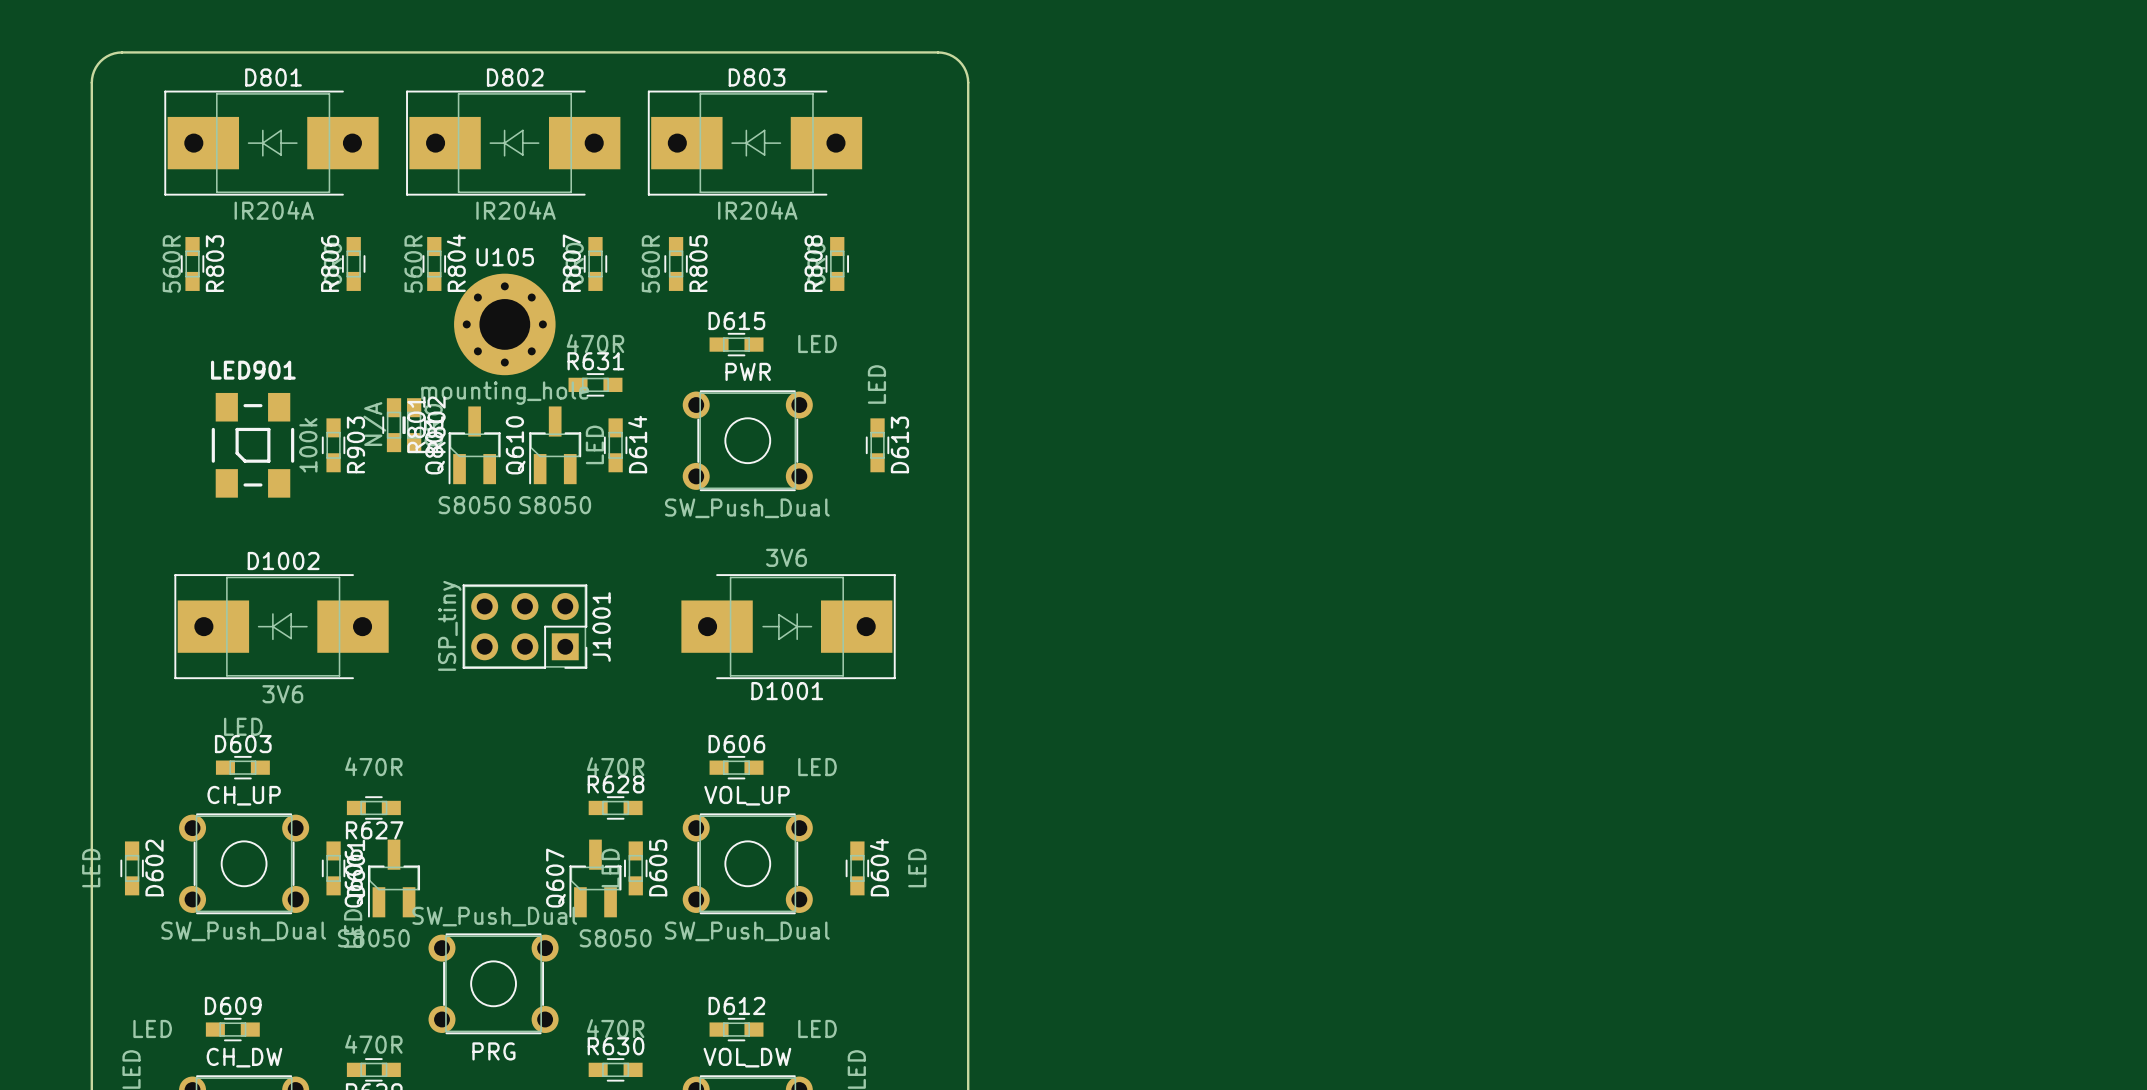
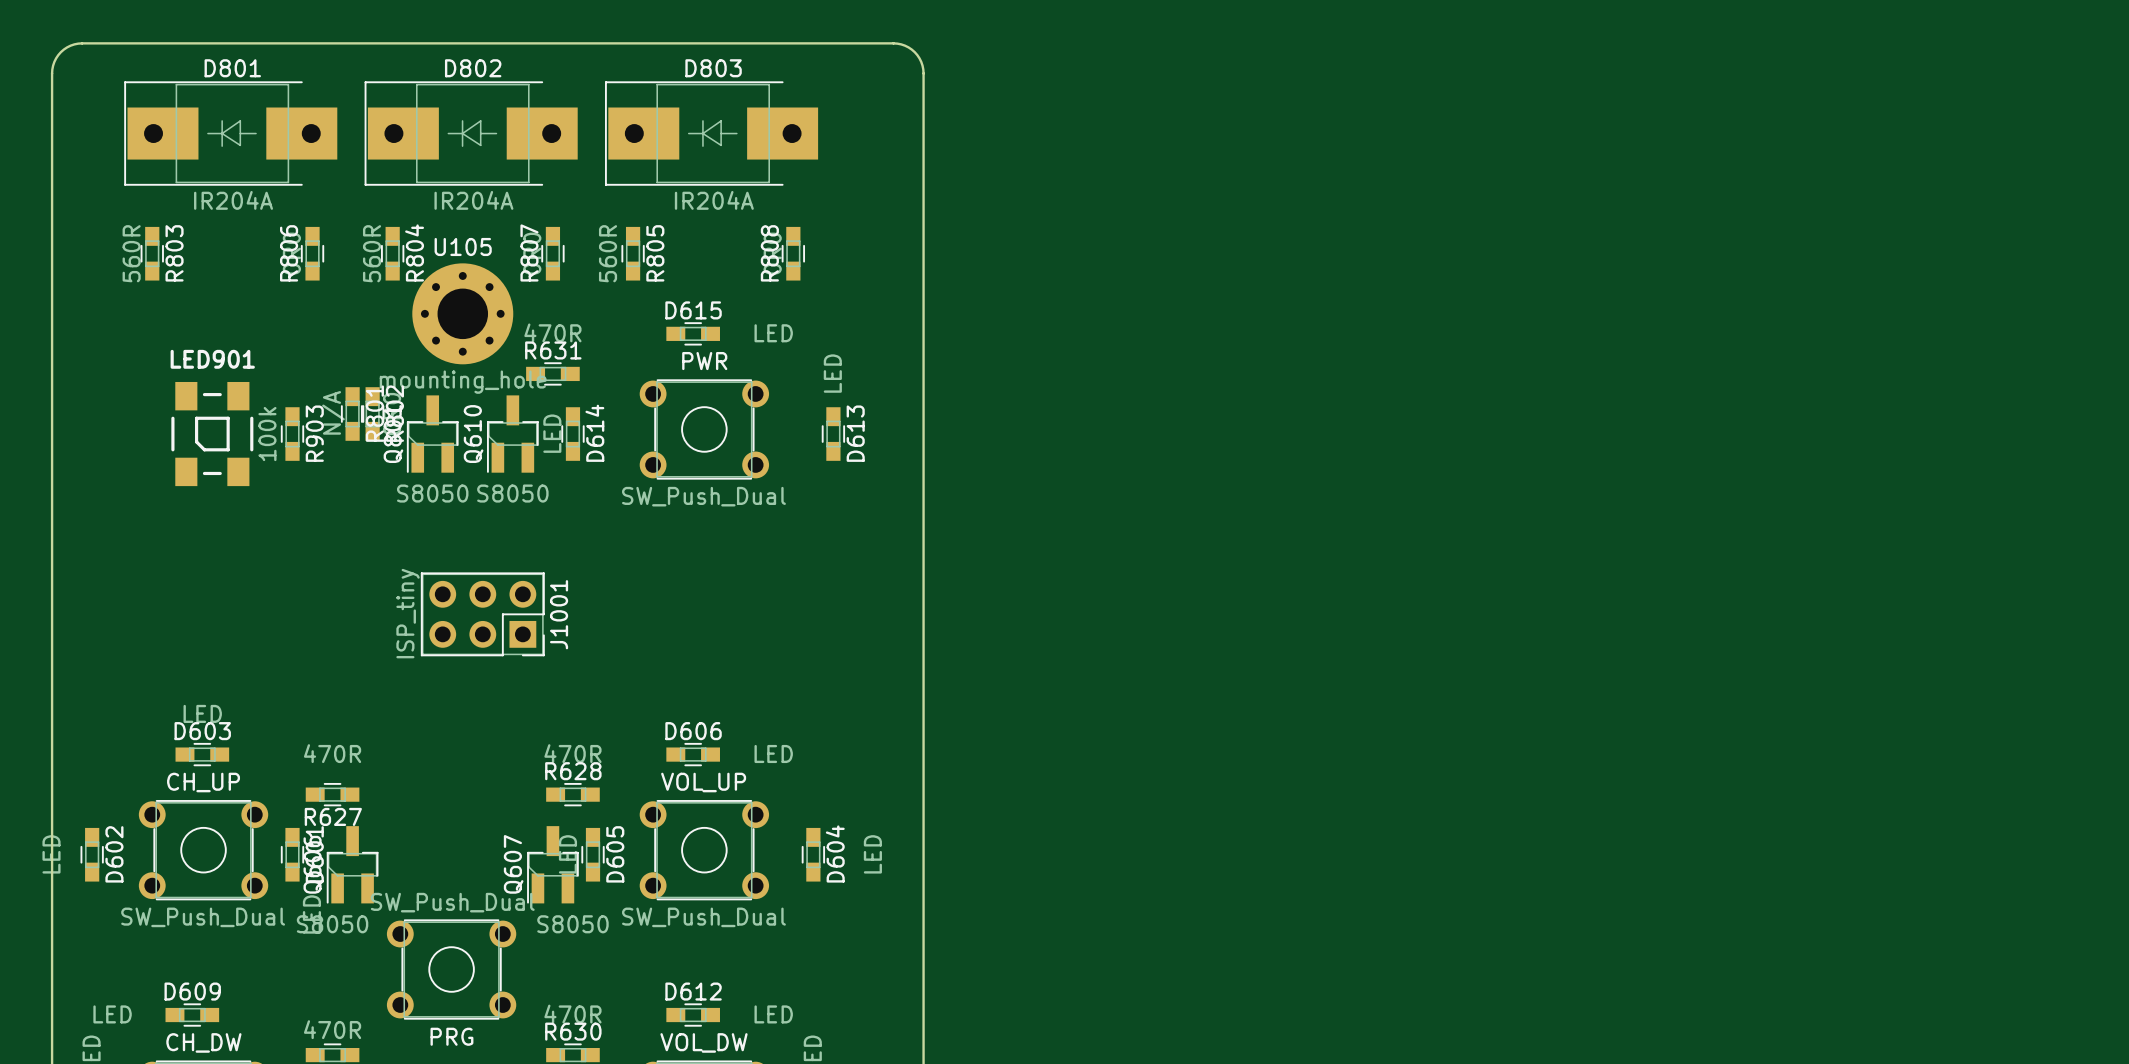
D1002: 3V6 (281, 626) -> none
D1001: 3V6 (788, 626) -> none

